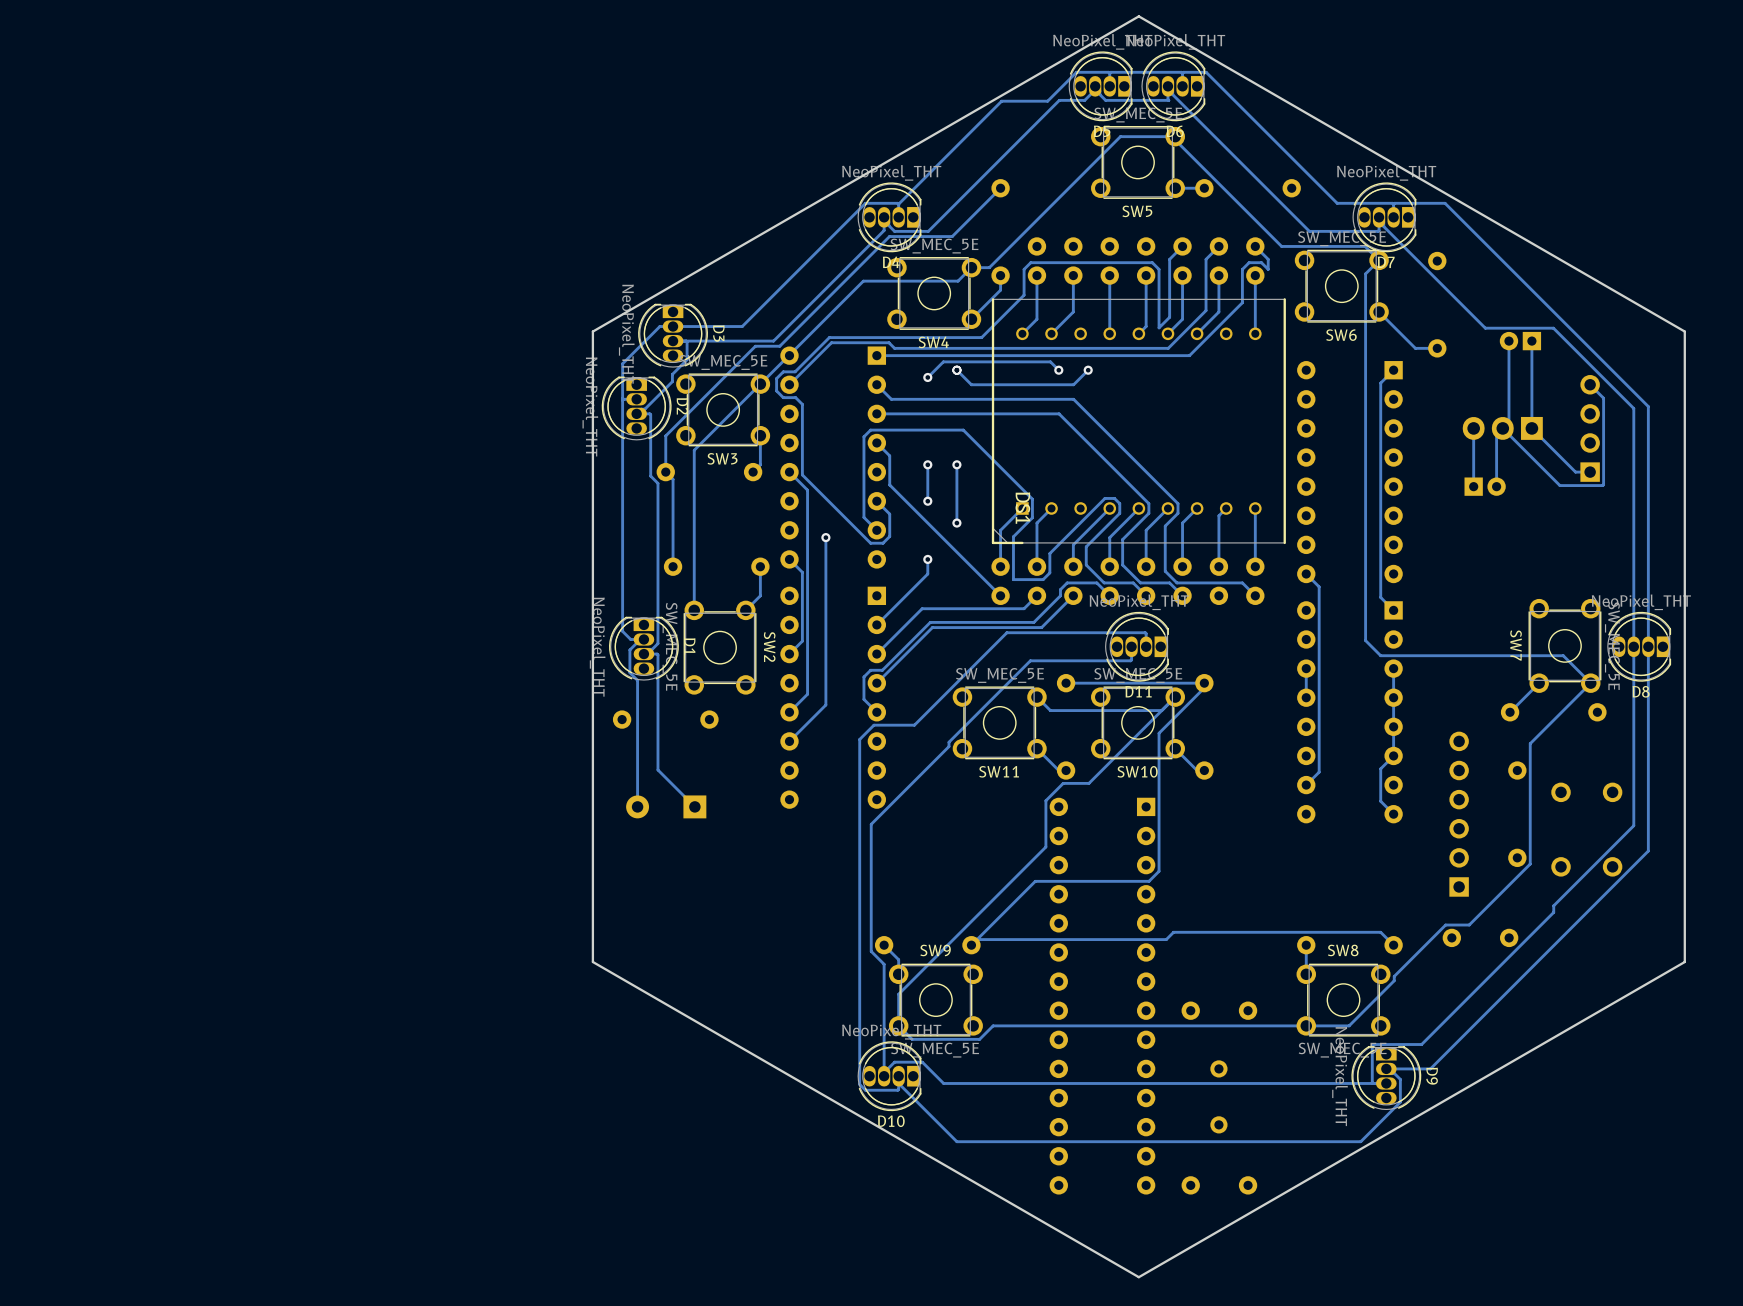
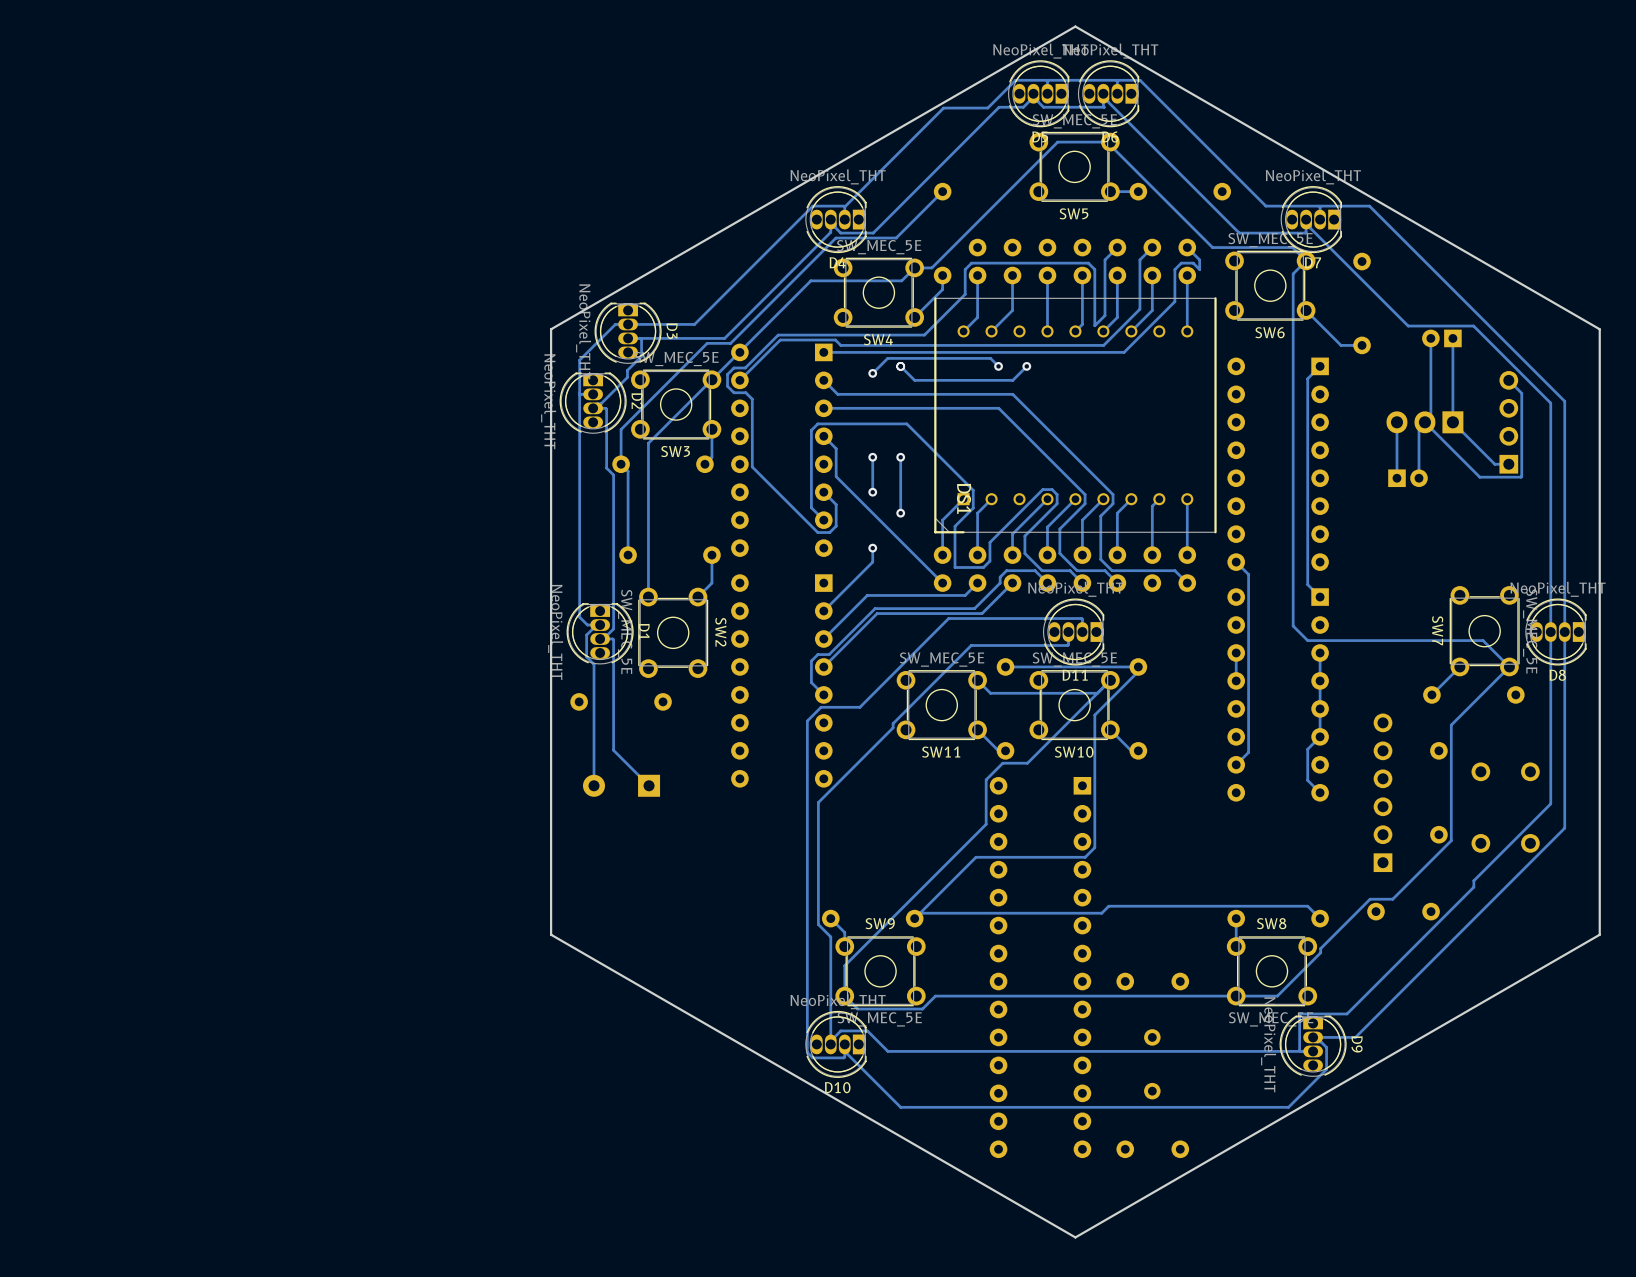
track: (789, 472) (807, 490) (807, 694) (789, 712) -> none
track: (825, 537) (825, 705) (789, 741) -> none
via: (825, 537) -> none
track: (789, 559) (802, 572) (802, 641) (789, 654) -> none

